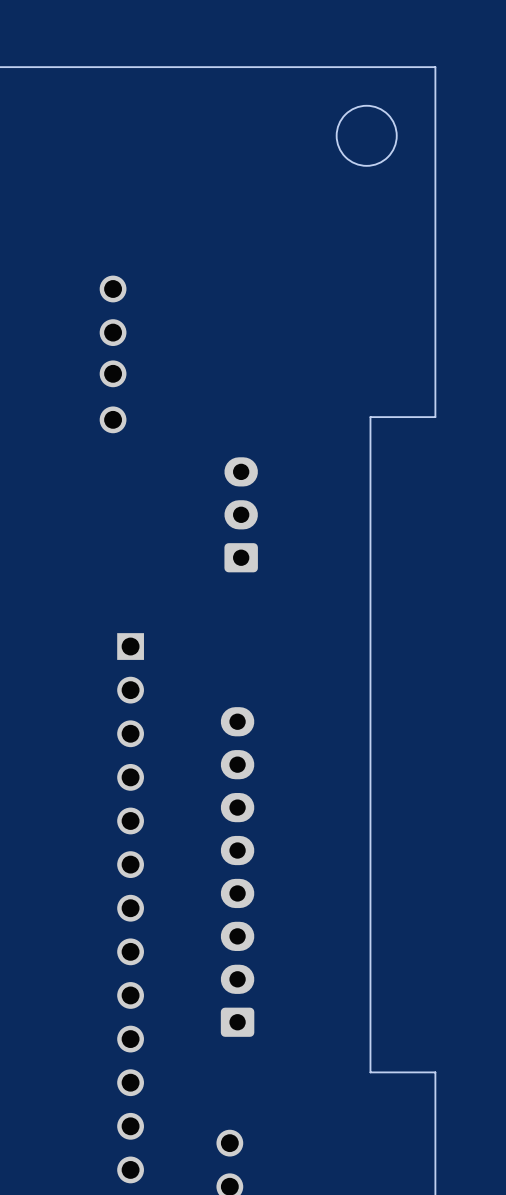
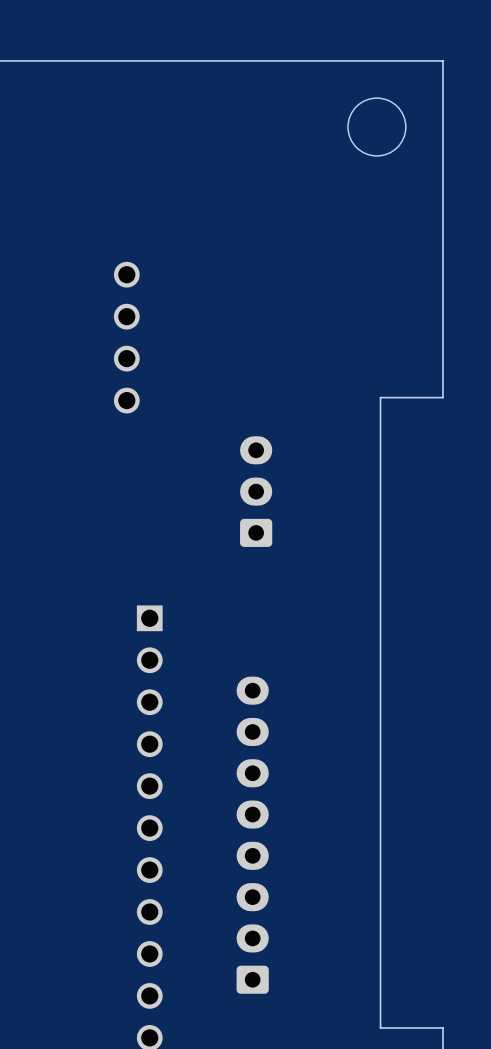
part footprint: [99, 275, 127, 434] -> [113, 261, 140, 414]

